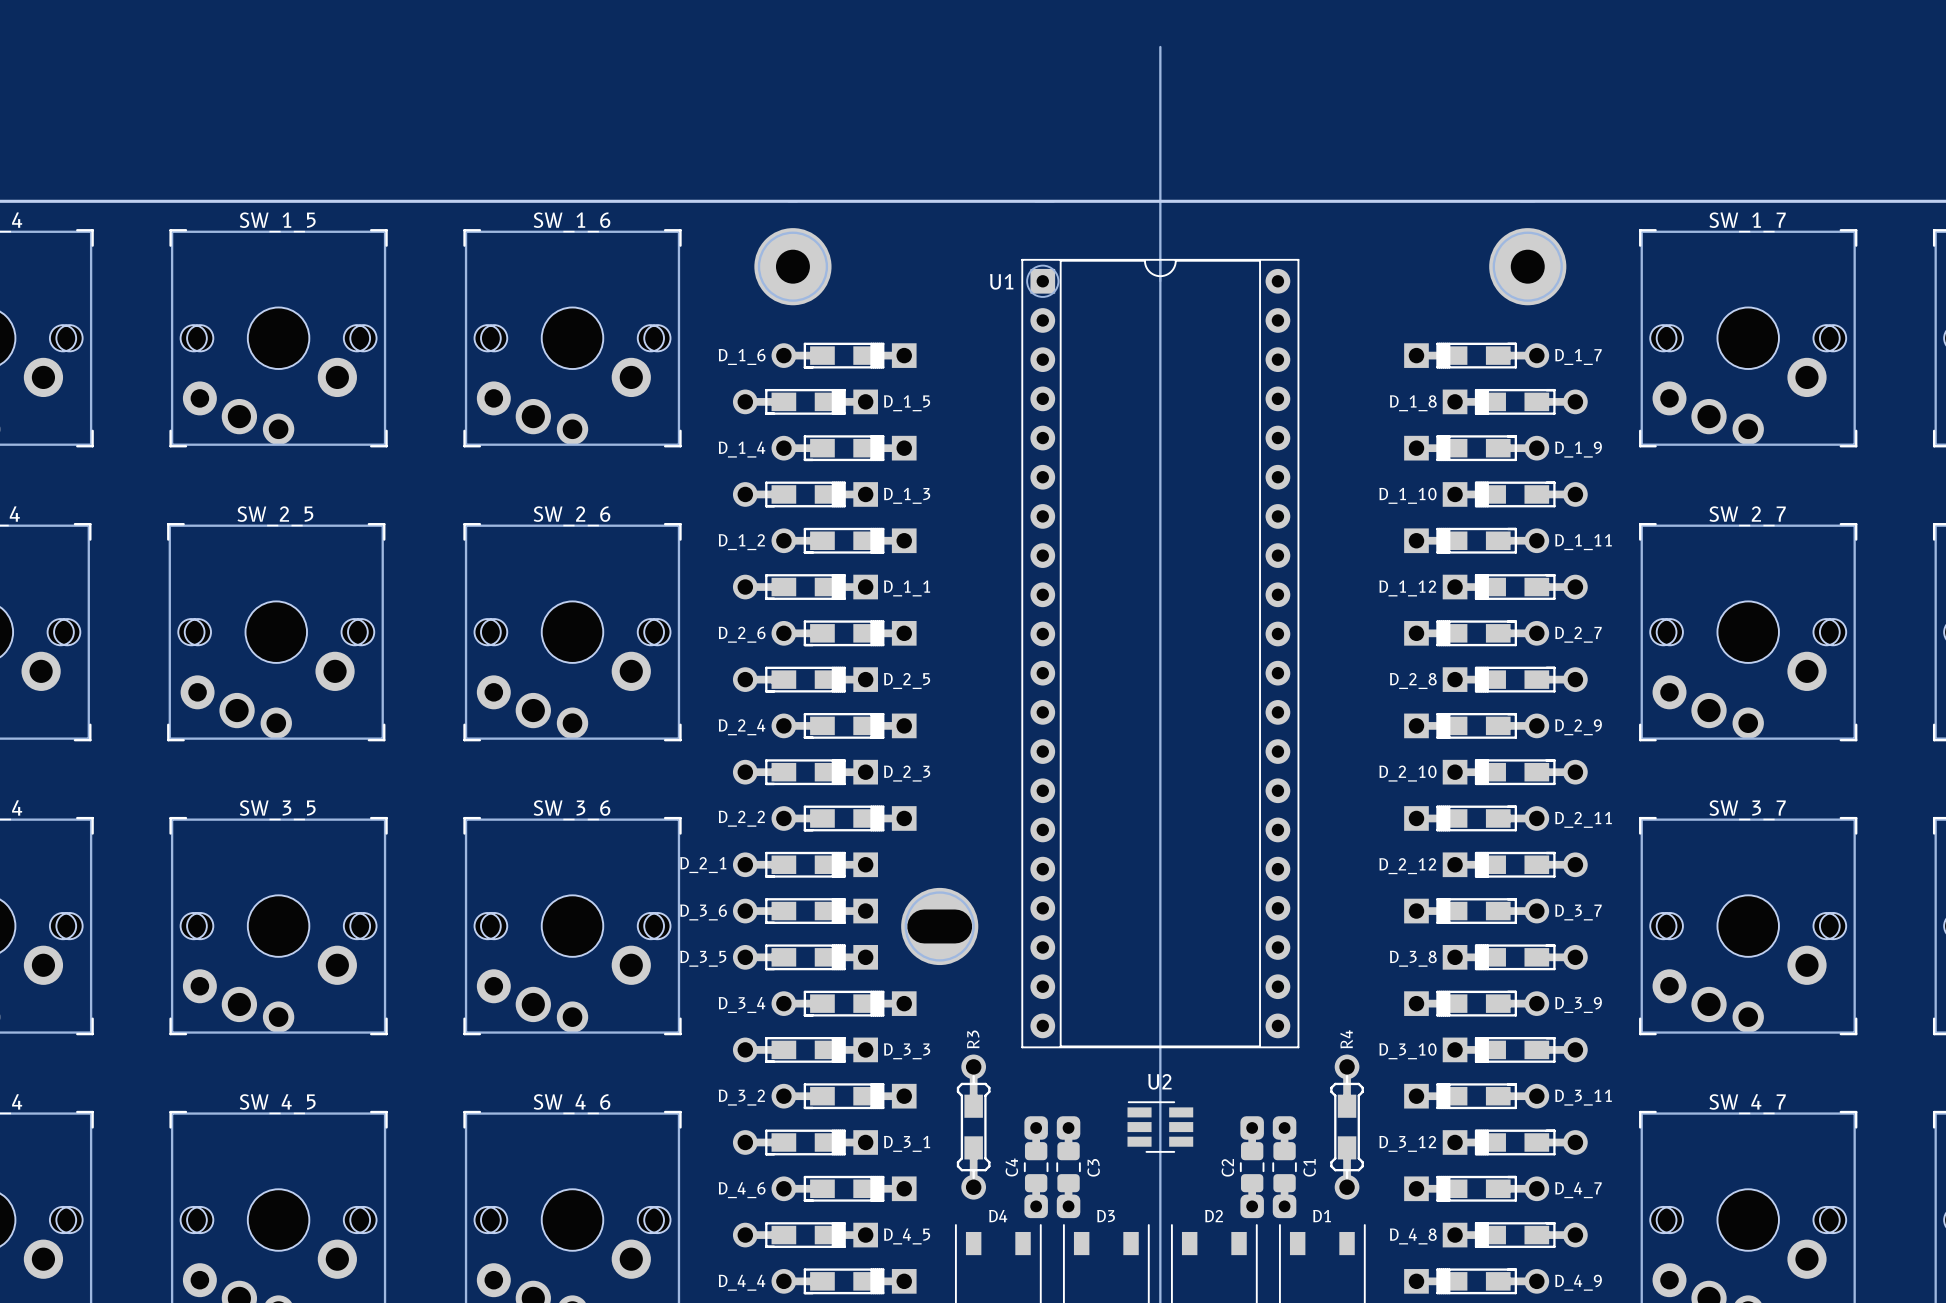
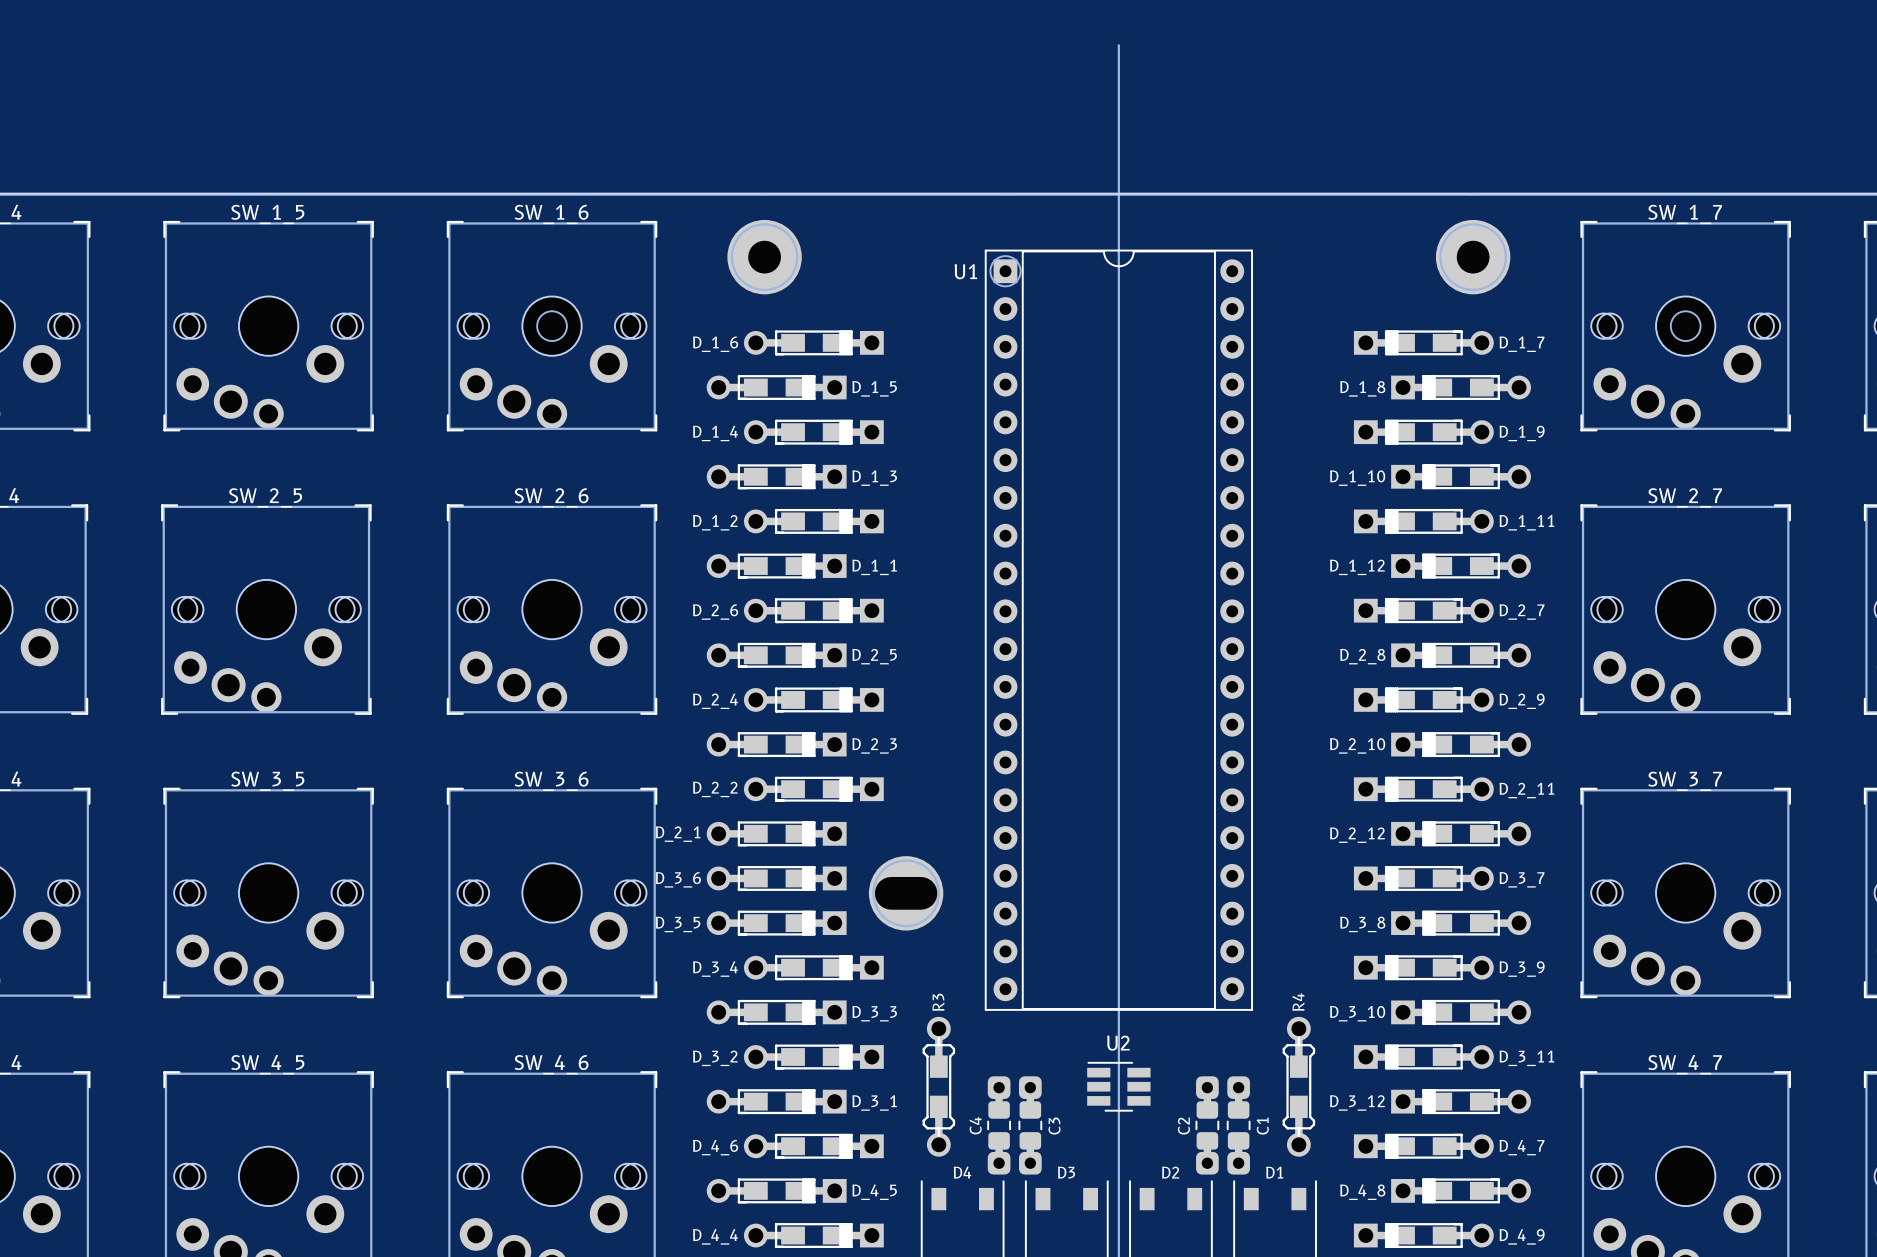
SW_1_6 footprint: [463, 229, 682, 448] -> [446, 220, 658, 432]
SW_1_7 footprint: [1639, 229, 1858, 448] -> [1580, 220, 1791, 432]

